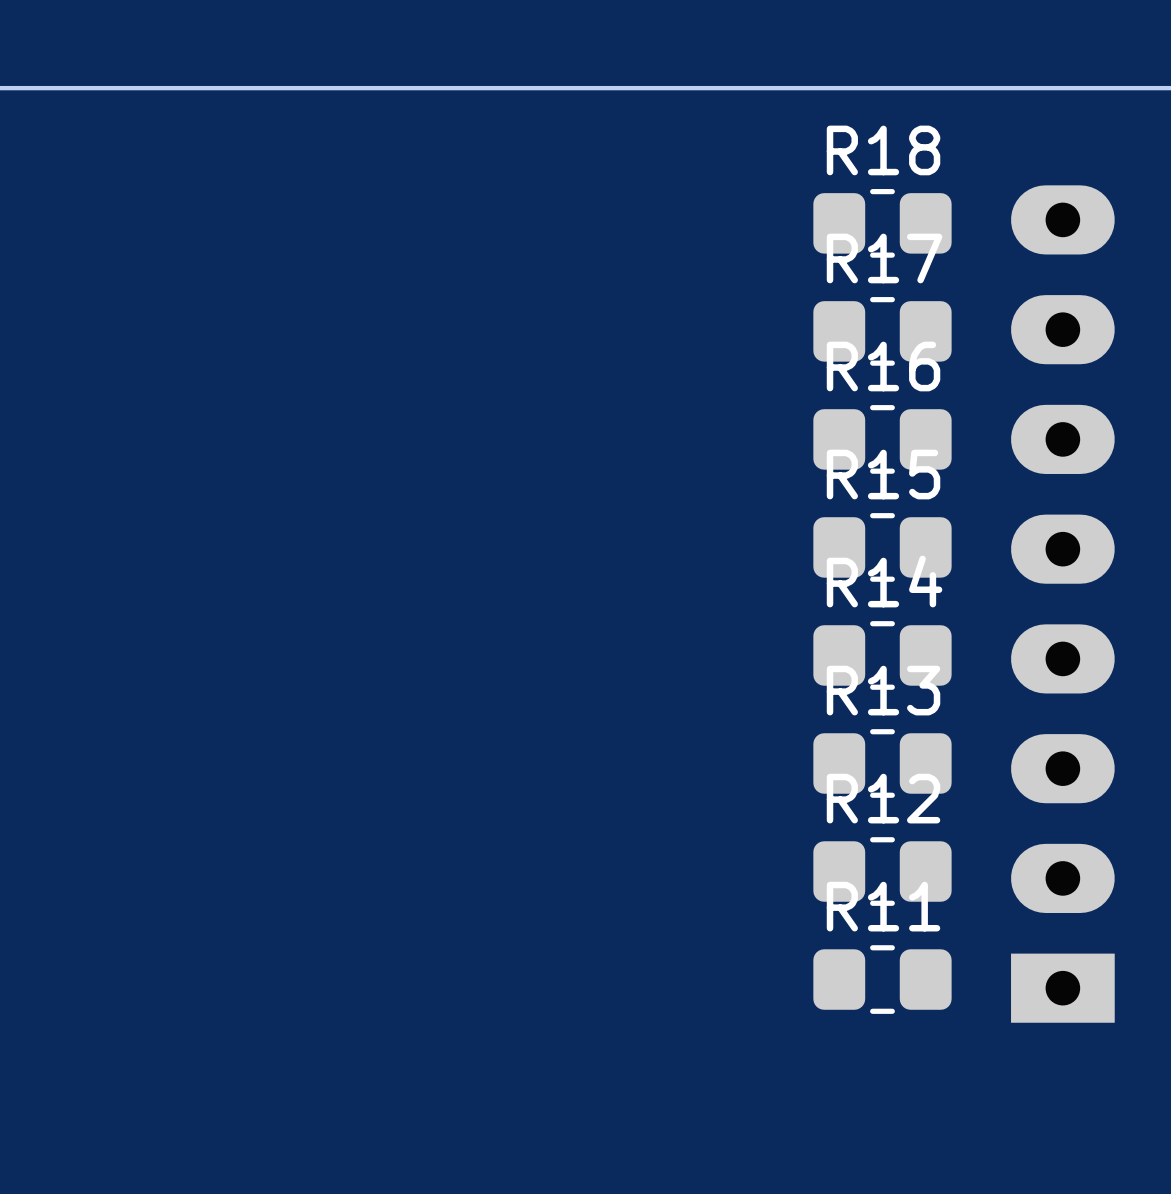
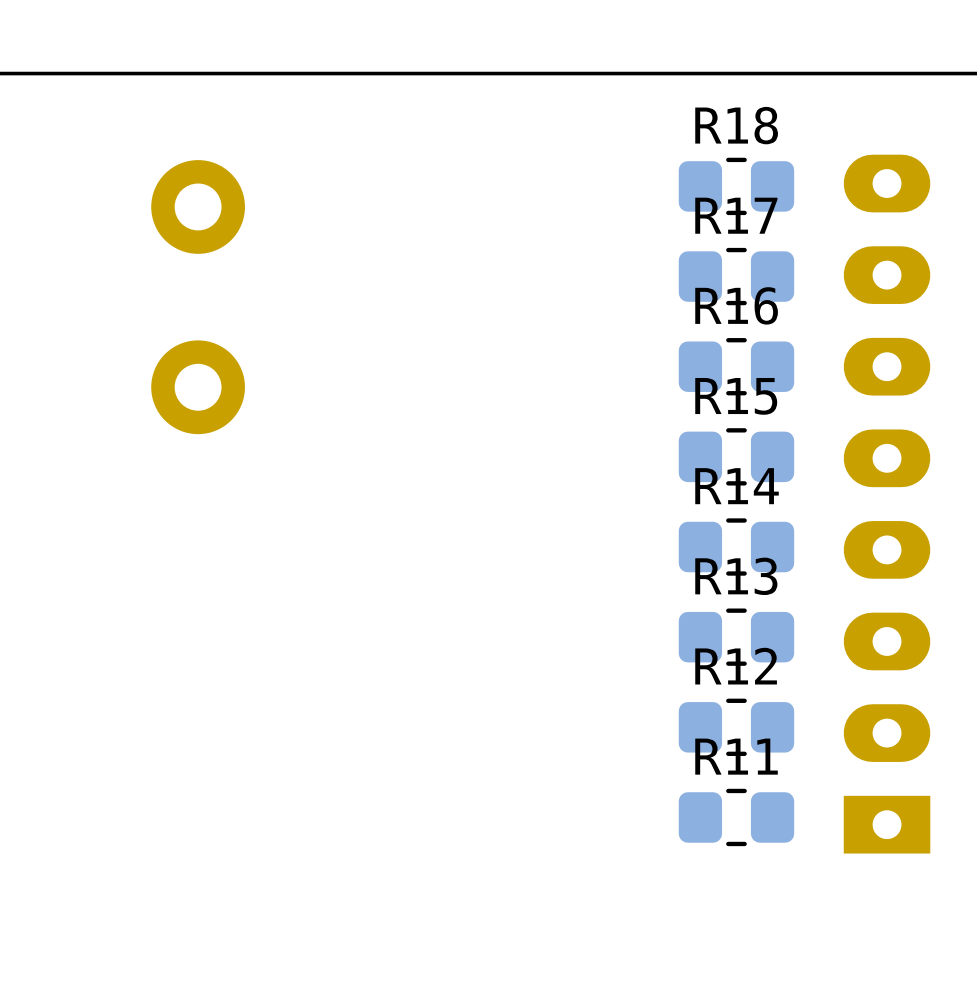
part: none -> (198, 297)

